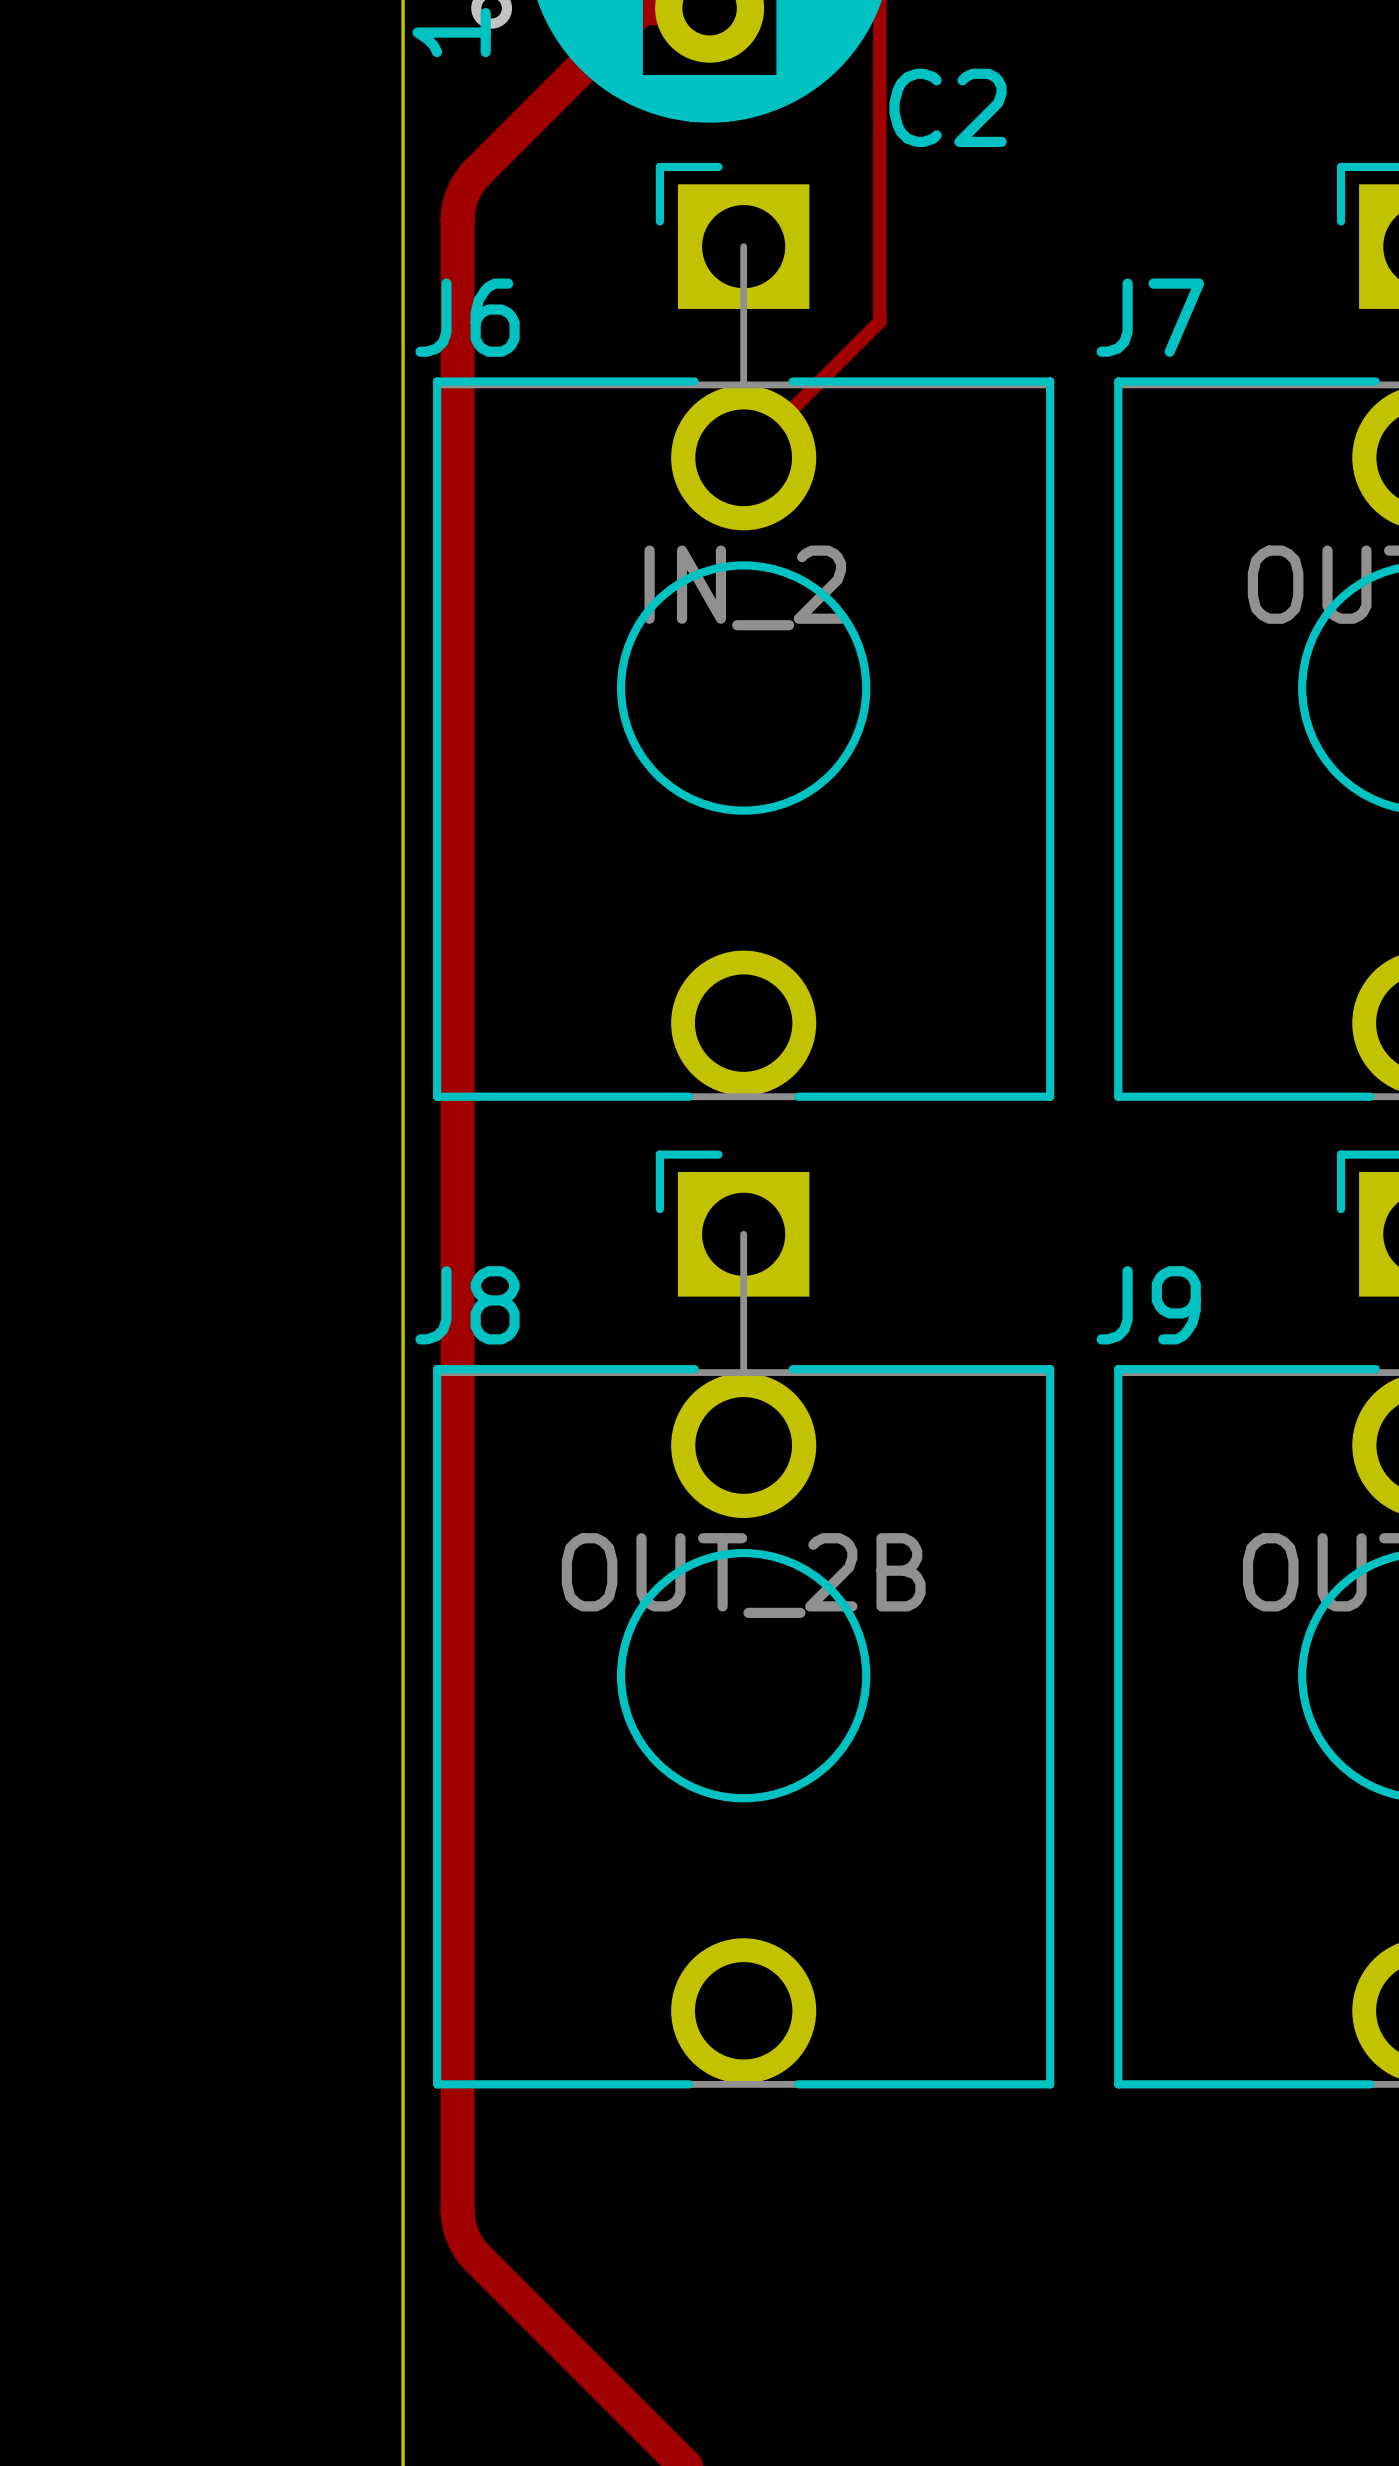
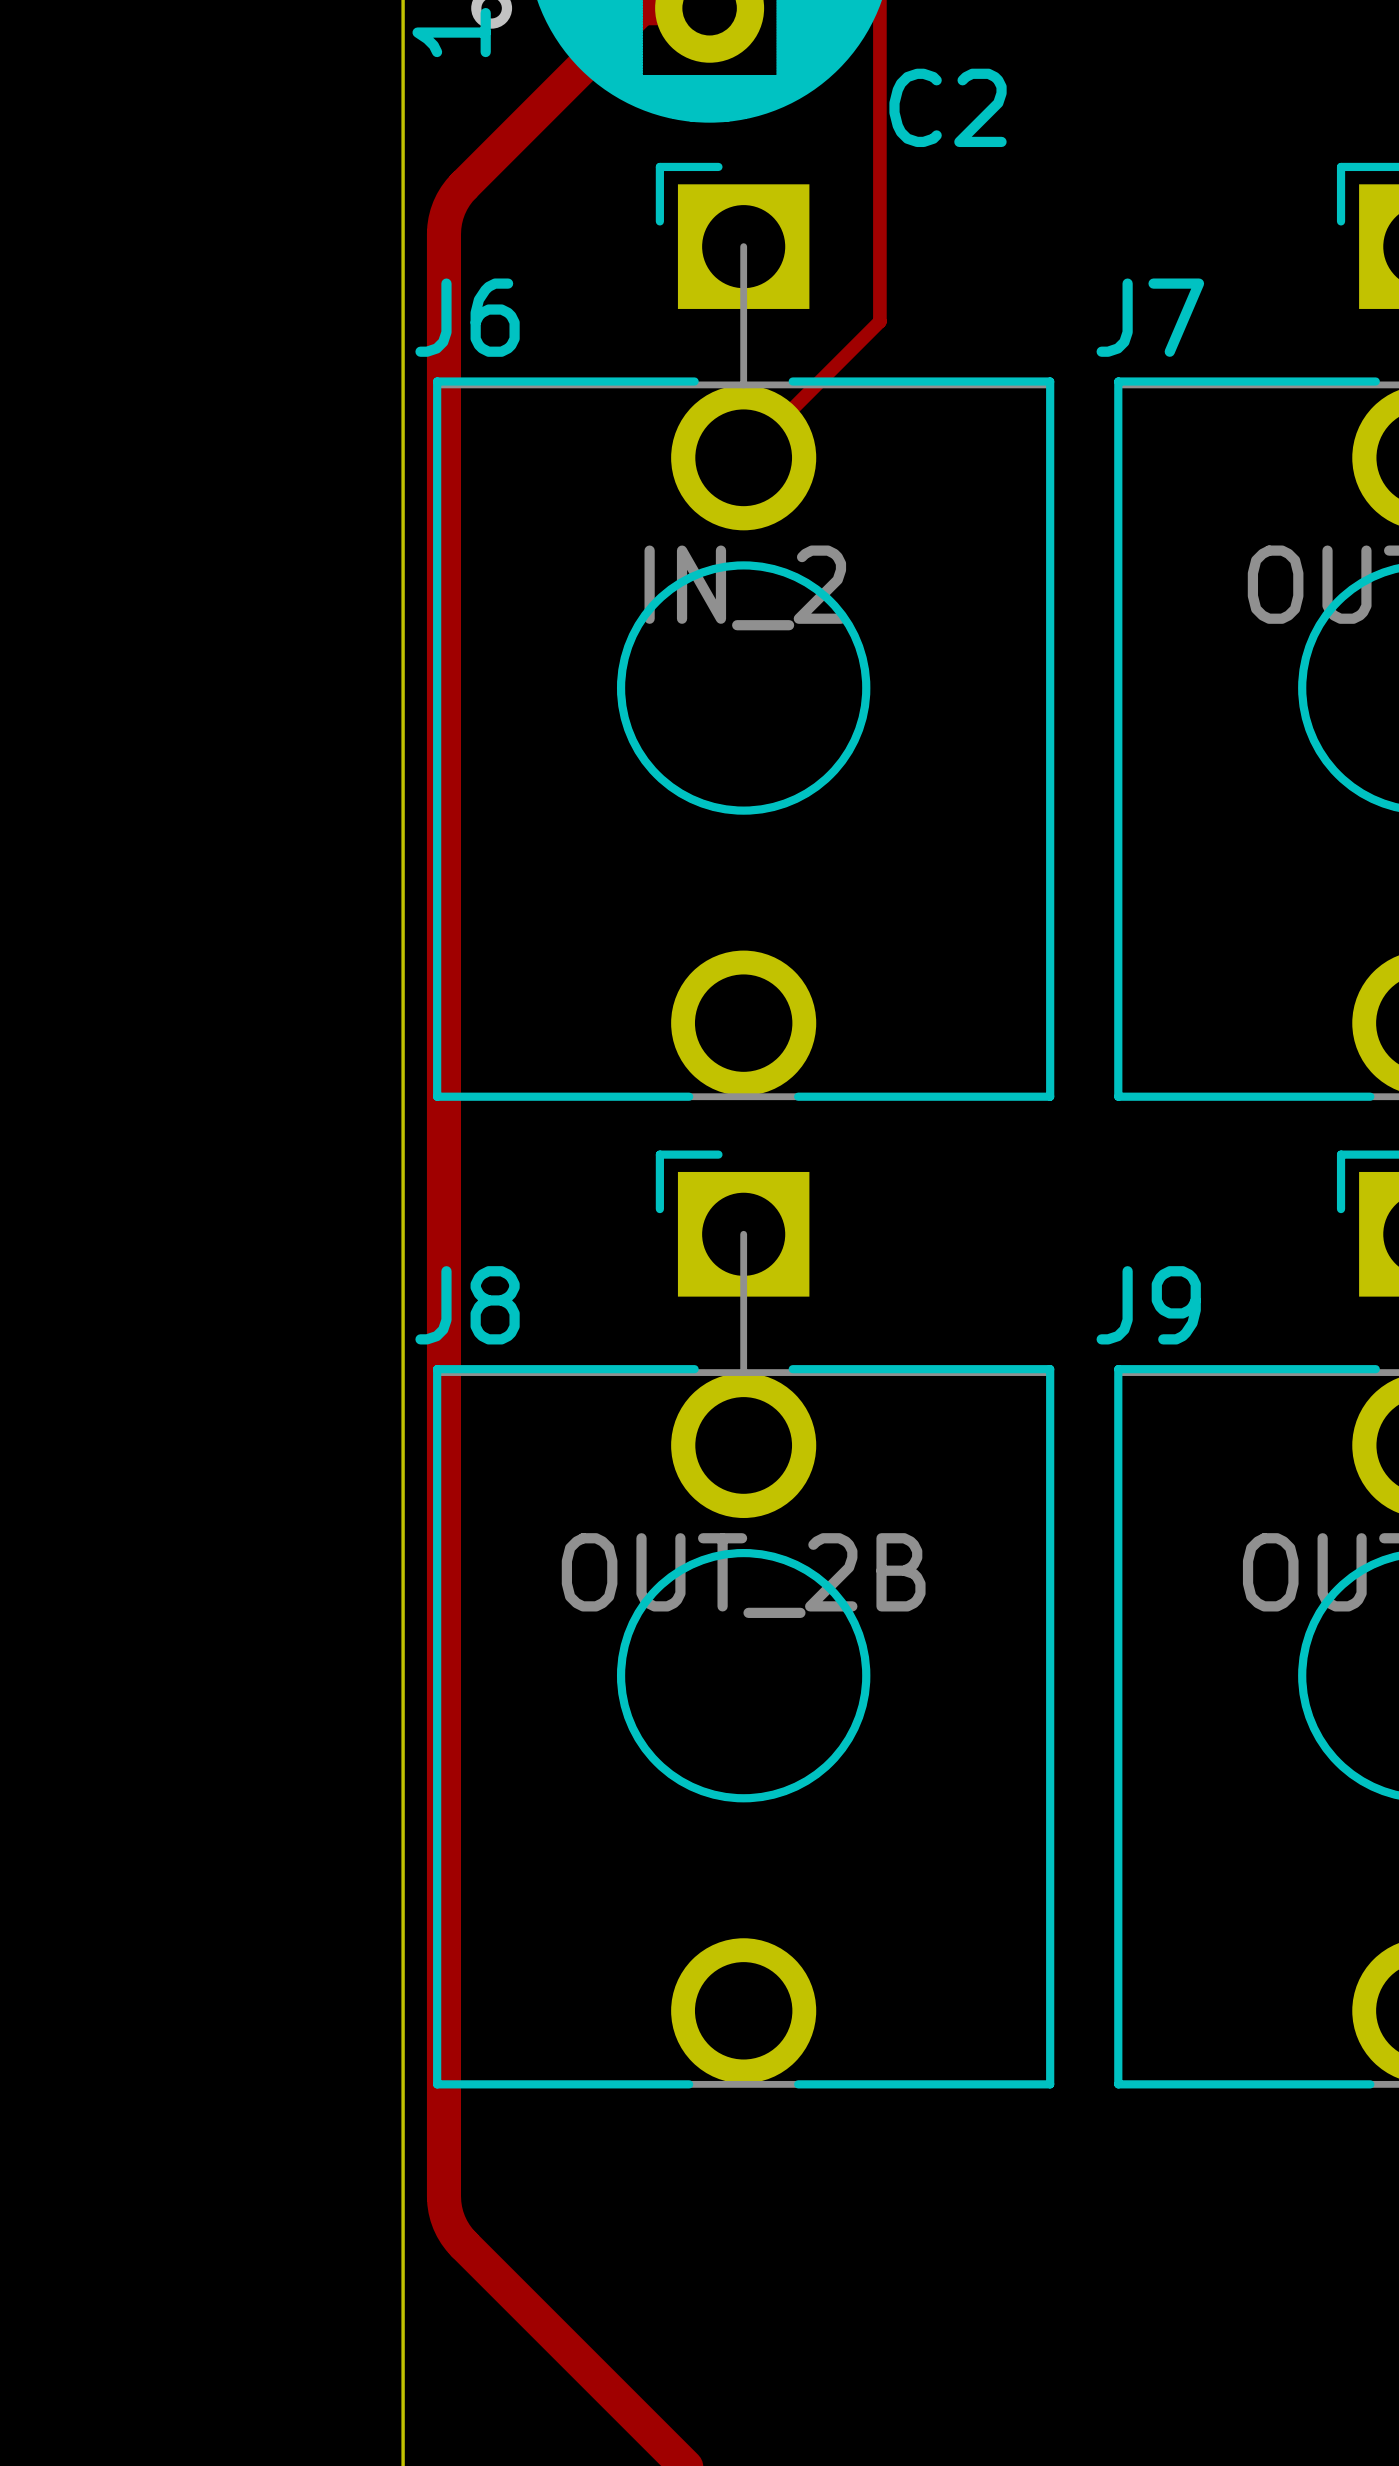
track: (477, 172) (462, 194) (457, 220) (457, 2210) (462, 2236) (477, 2258) -> (477, 172) (459, 190) (452, 201) (446, 214) (443, 233) (443, 2196) (445, 2209) (452, 2228) (459, 2239) (477, 2258)

